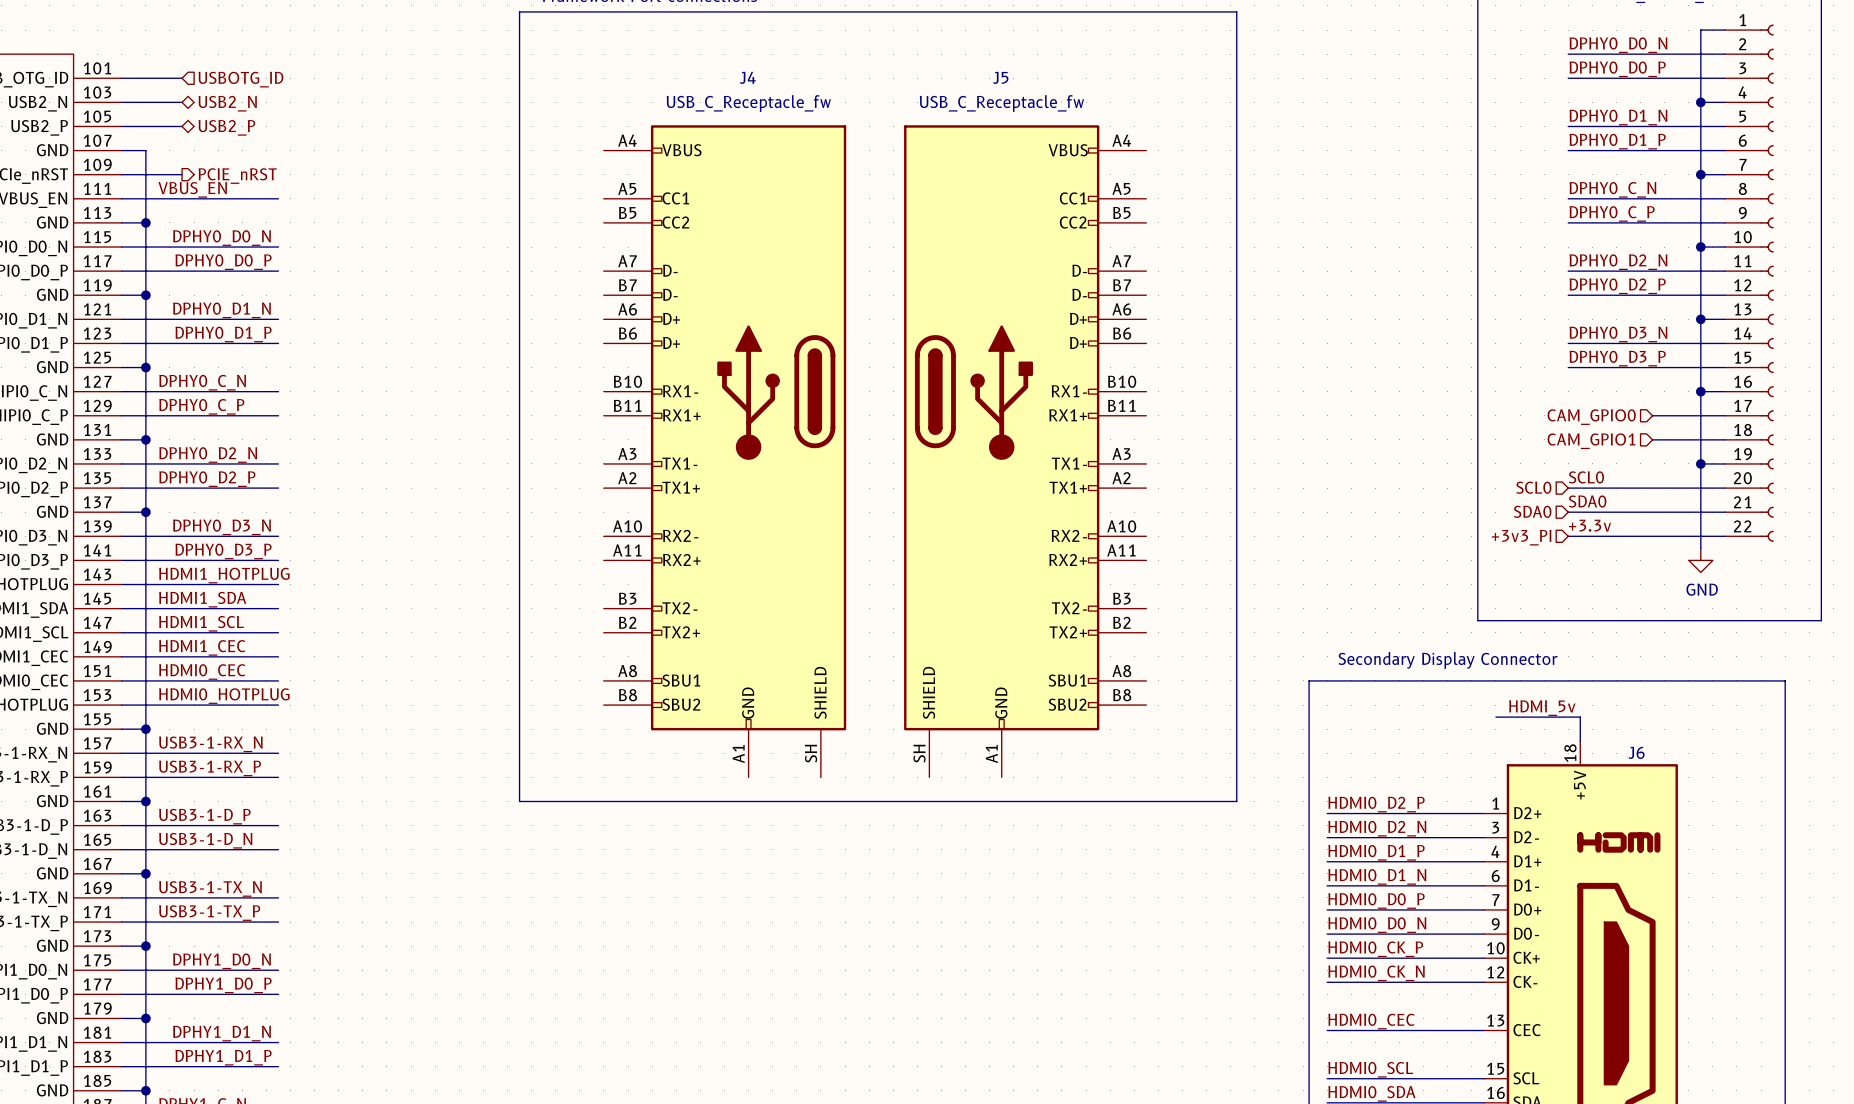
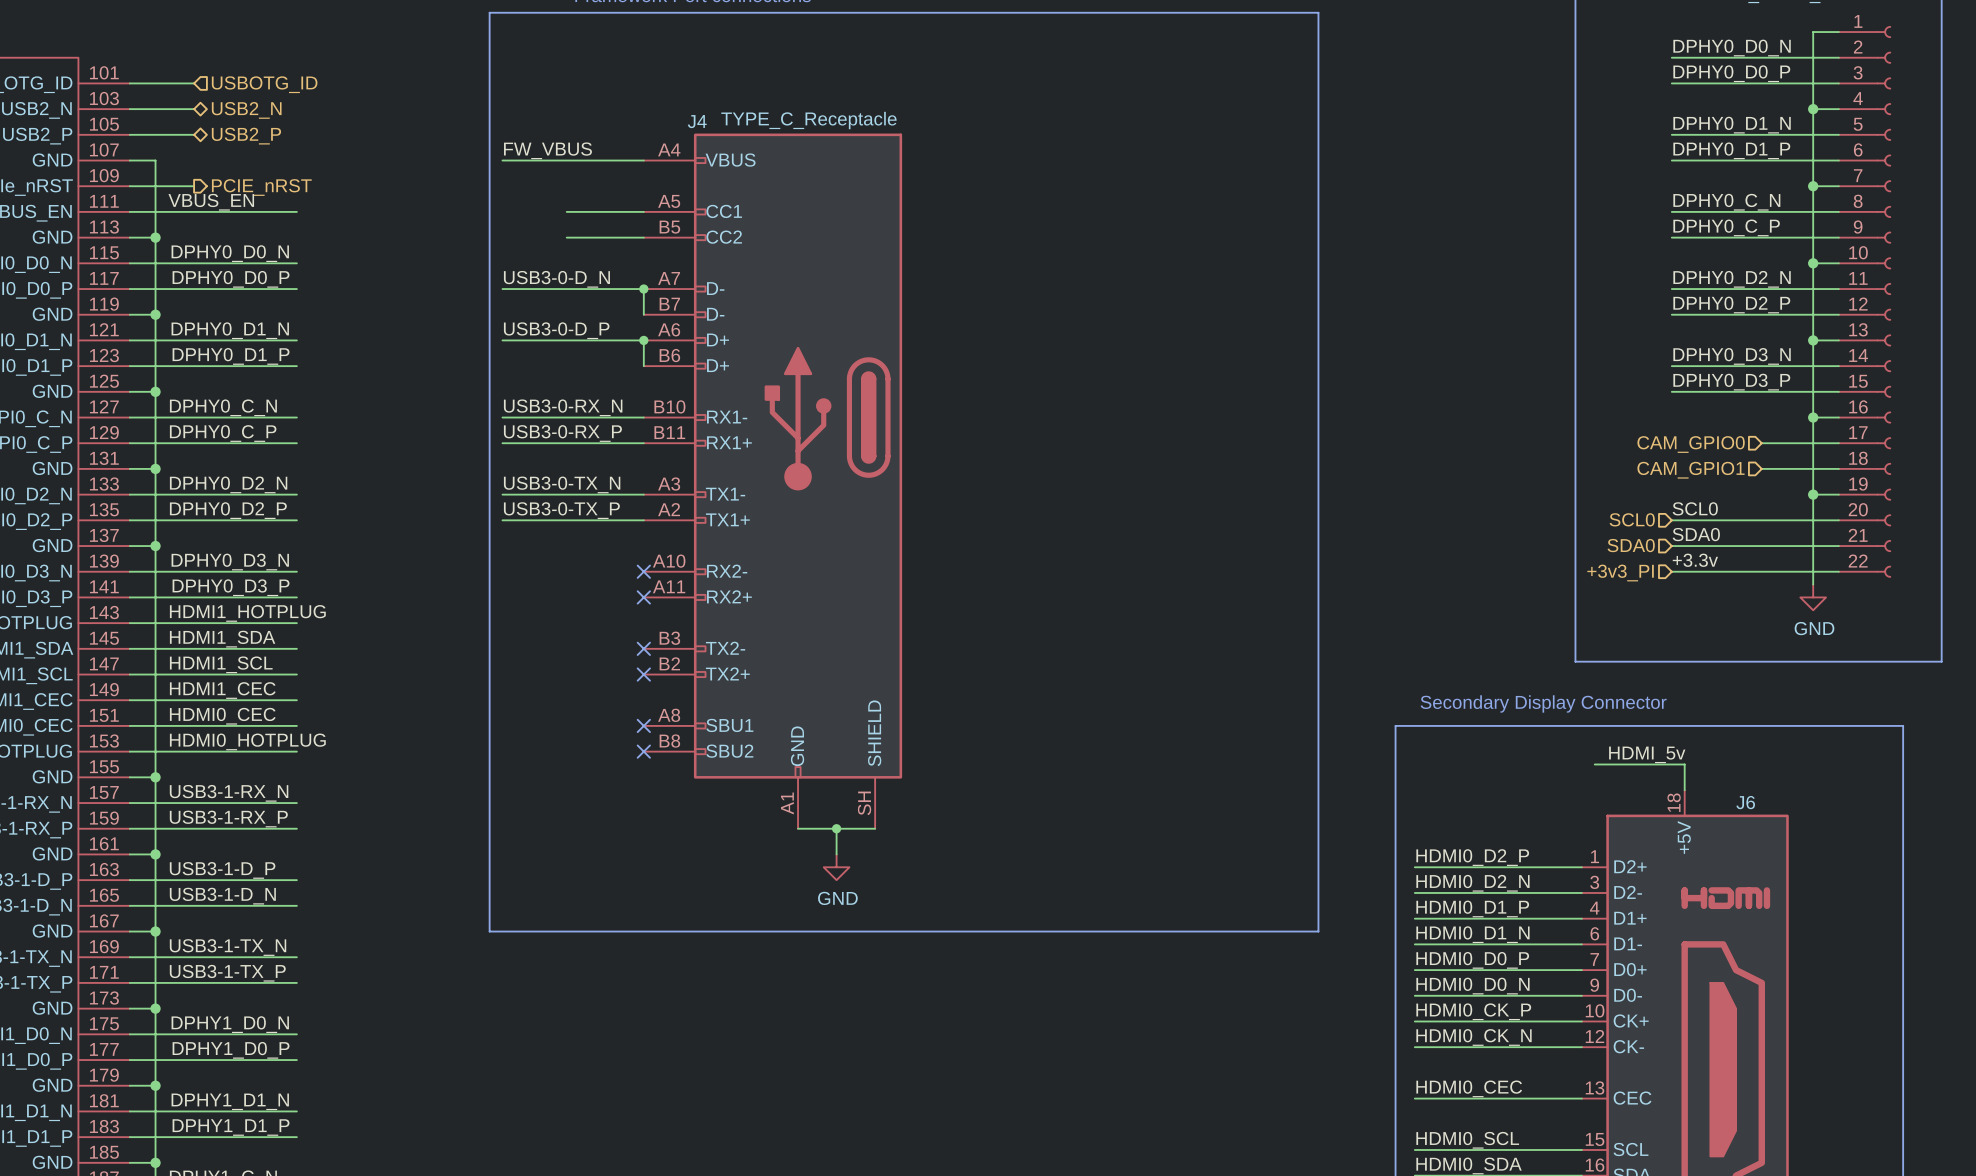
line: (519, 11) (519, 801) (1236, 801) -> (553, 12) (489, 12) (489, 931) (1318, 931) (1318, 854)
J4 name position: J4 (747, 77) -> J4 (697, 121)
J4 value: USB_C_Receptacle_fw (748, 103) -> TYPE_C_Receptacle (808, 120)
label: none -> FW_VBUS (547, 150)
wire: none -> (502, 160) (643, 160)
wire: none -> (566, 211) (643, 211)
wire: none -> (566, 237) (643, 237)
label: none -> USB3-0-D_N (556, 279)
wire: none -> (502, 289) (643, 289) (643, 314)
junction: none -> (643, 289)
label: none -> USB3-0-D_P (556, 330)
wire: none -> (502, 340) (643, 340) (643, 366)
junction: none -> (643, 340)
label: none -> USB3-0-RX_N (563, 407)
wire: none -> (502, 417) (643, 417)
label: none -> USB3-0-RX_P (562, 433)
wire: none -> (502, 443) (643, 443)
J5: USB_C_Receptacle_fw (1025, 451) -> none
label: none -> USB3-0-TX_N (562, 484)
wire: none -> (502, 494) (643, 494)
label: none -> USB3-0-TX_P (561, 510)
wire: none -> (502, 520) (643, 520)
no-connect mark: none -> (643, 571)
no-connect mark: none -> (643, 597)
no-connect mark: none -> (643, 648)
no-connect mark: none -> (643, 674)
no-connect mark: none -> (643, 725)
no-connect mark: none -> (643, 751)
wire: none -> (798, 828) (875, 828)
wire: none -> (836, 828) (836, 854)
junction: none -> (836, 828)
power symbol: none -> GND (836, 867)

